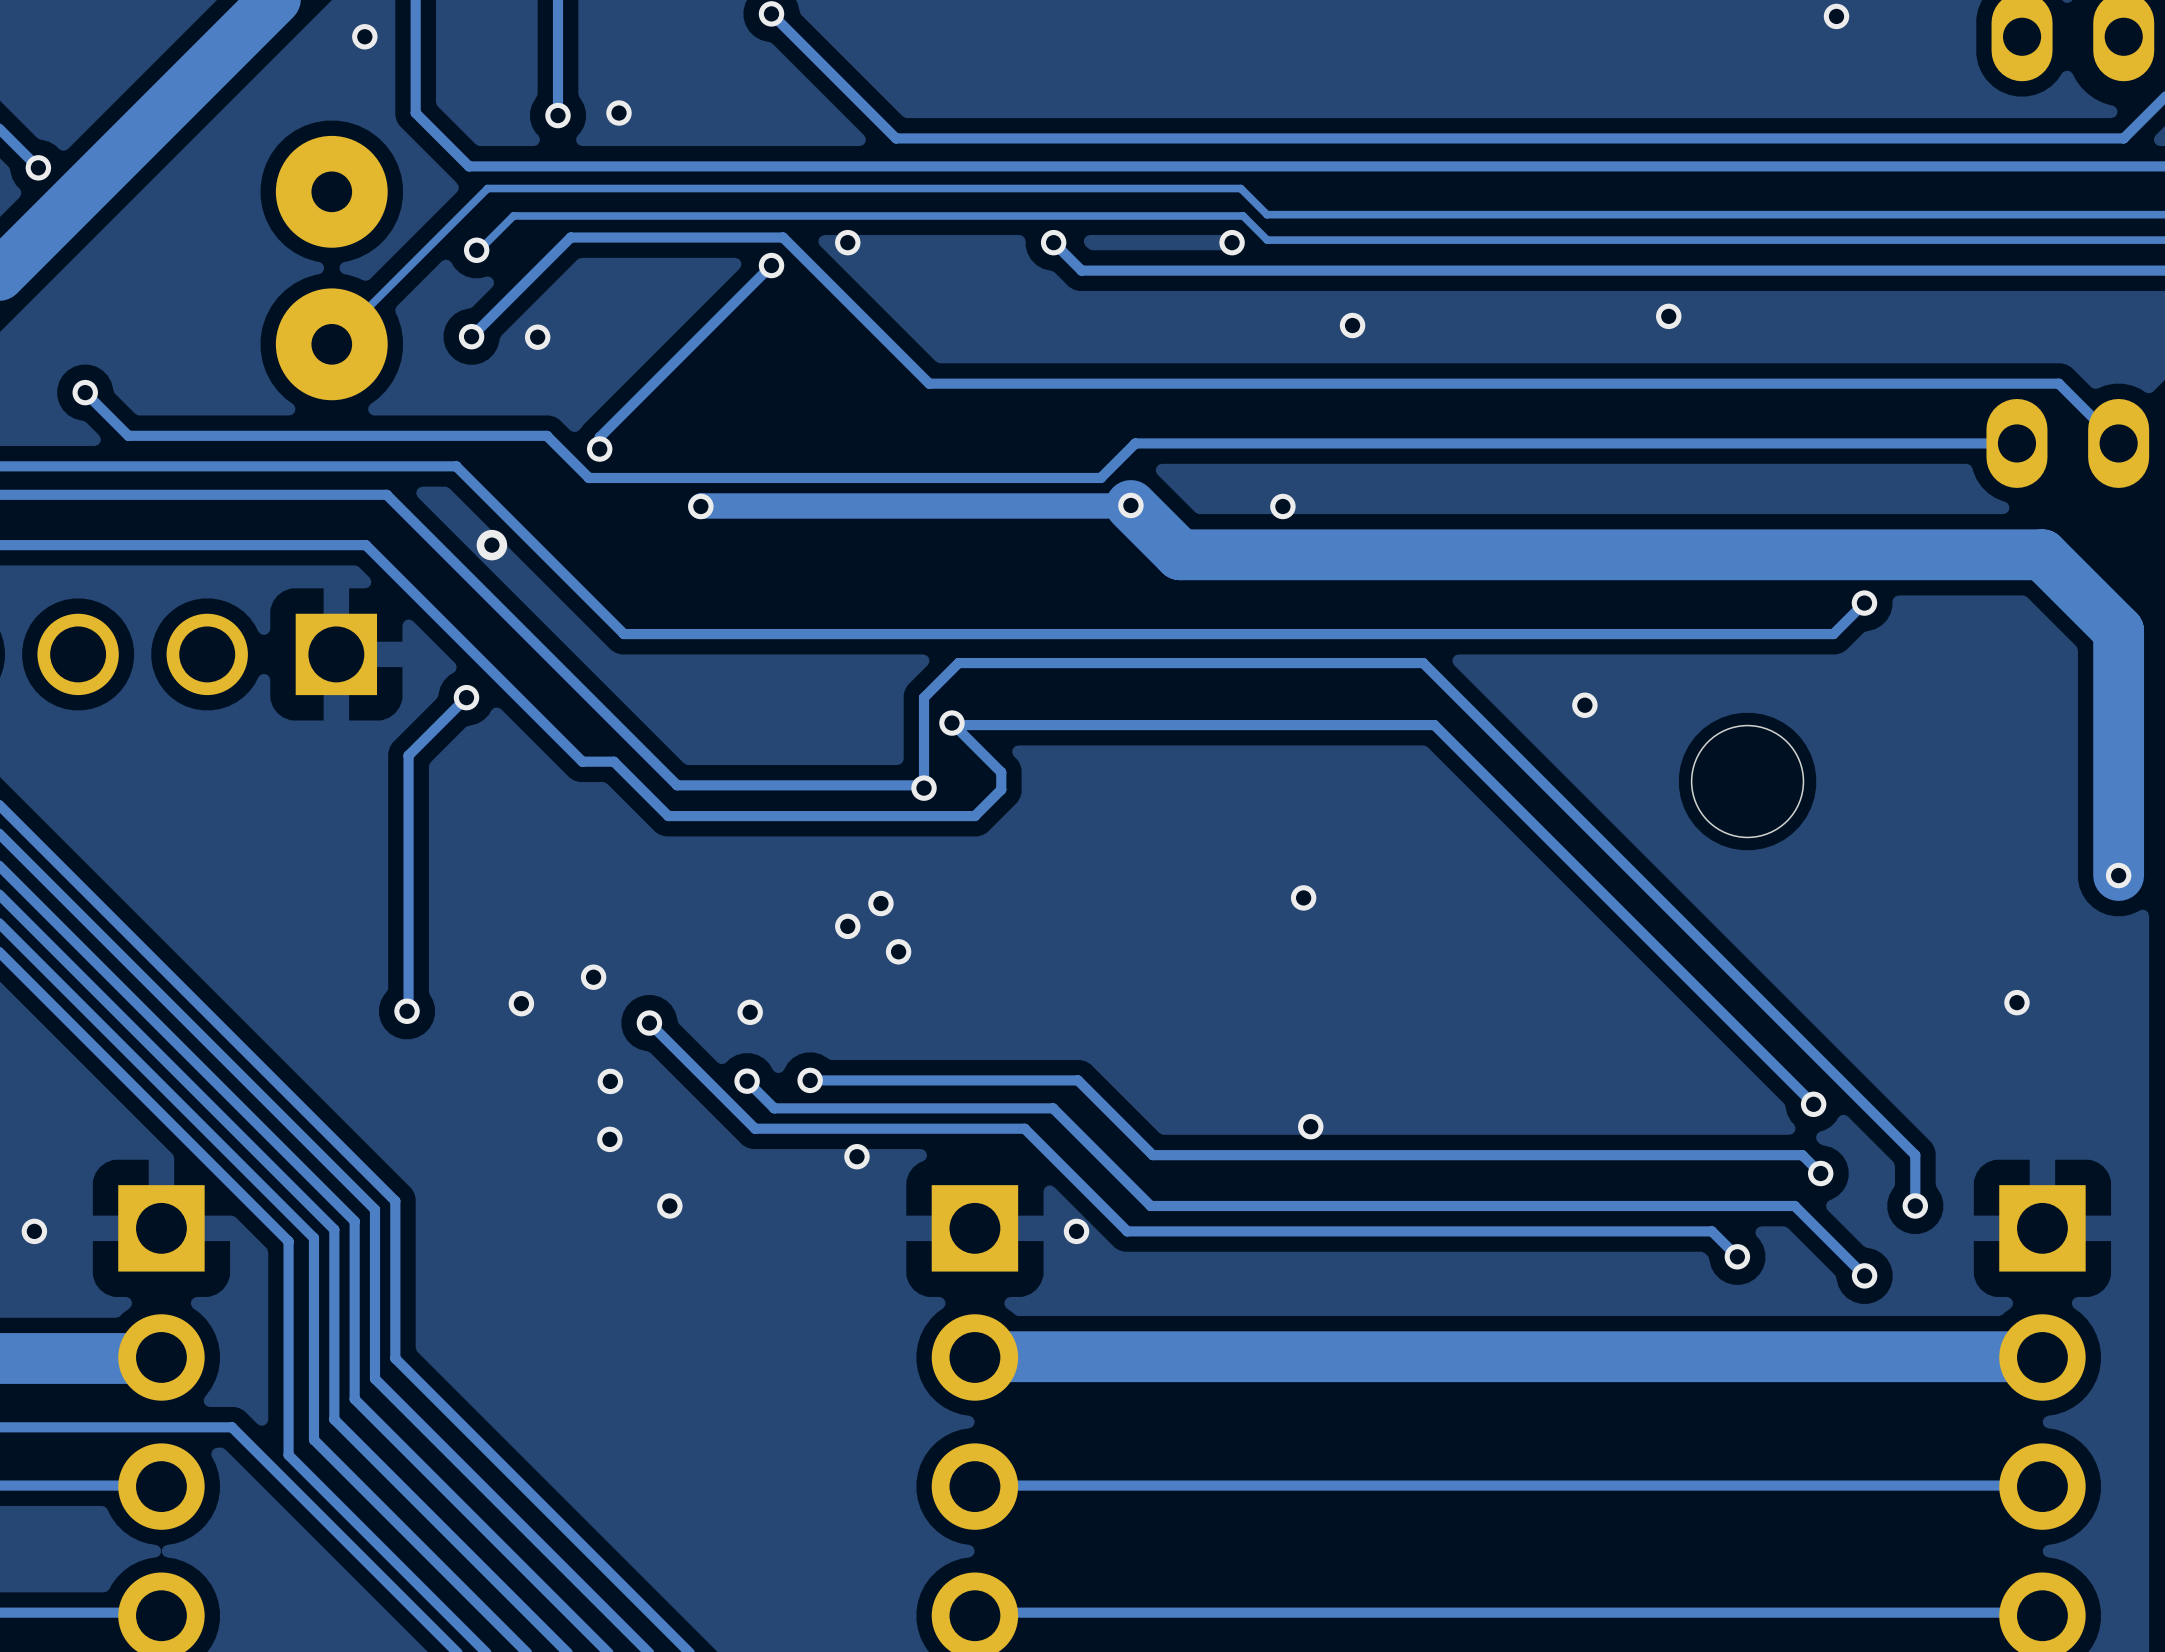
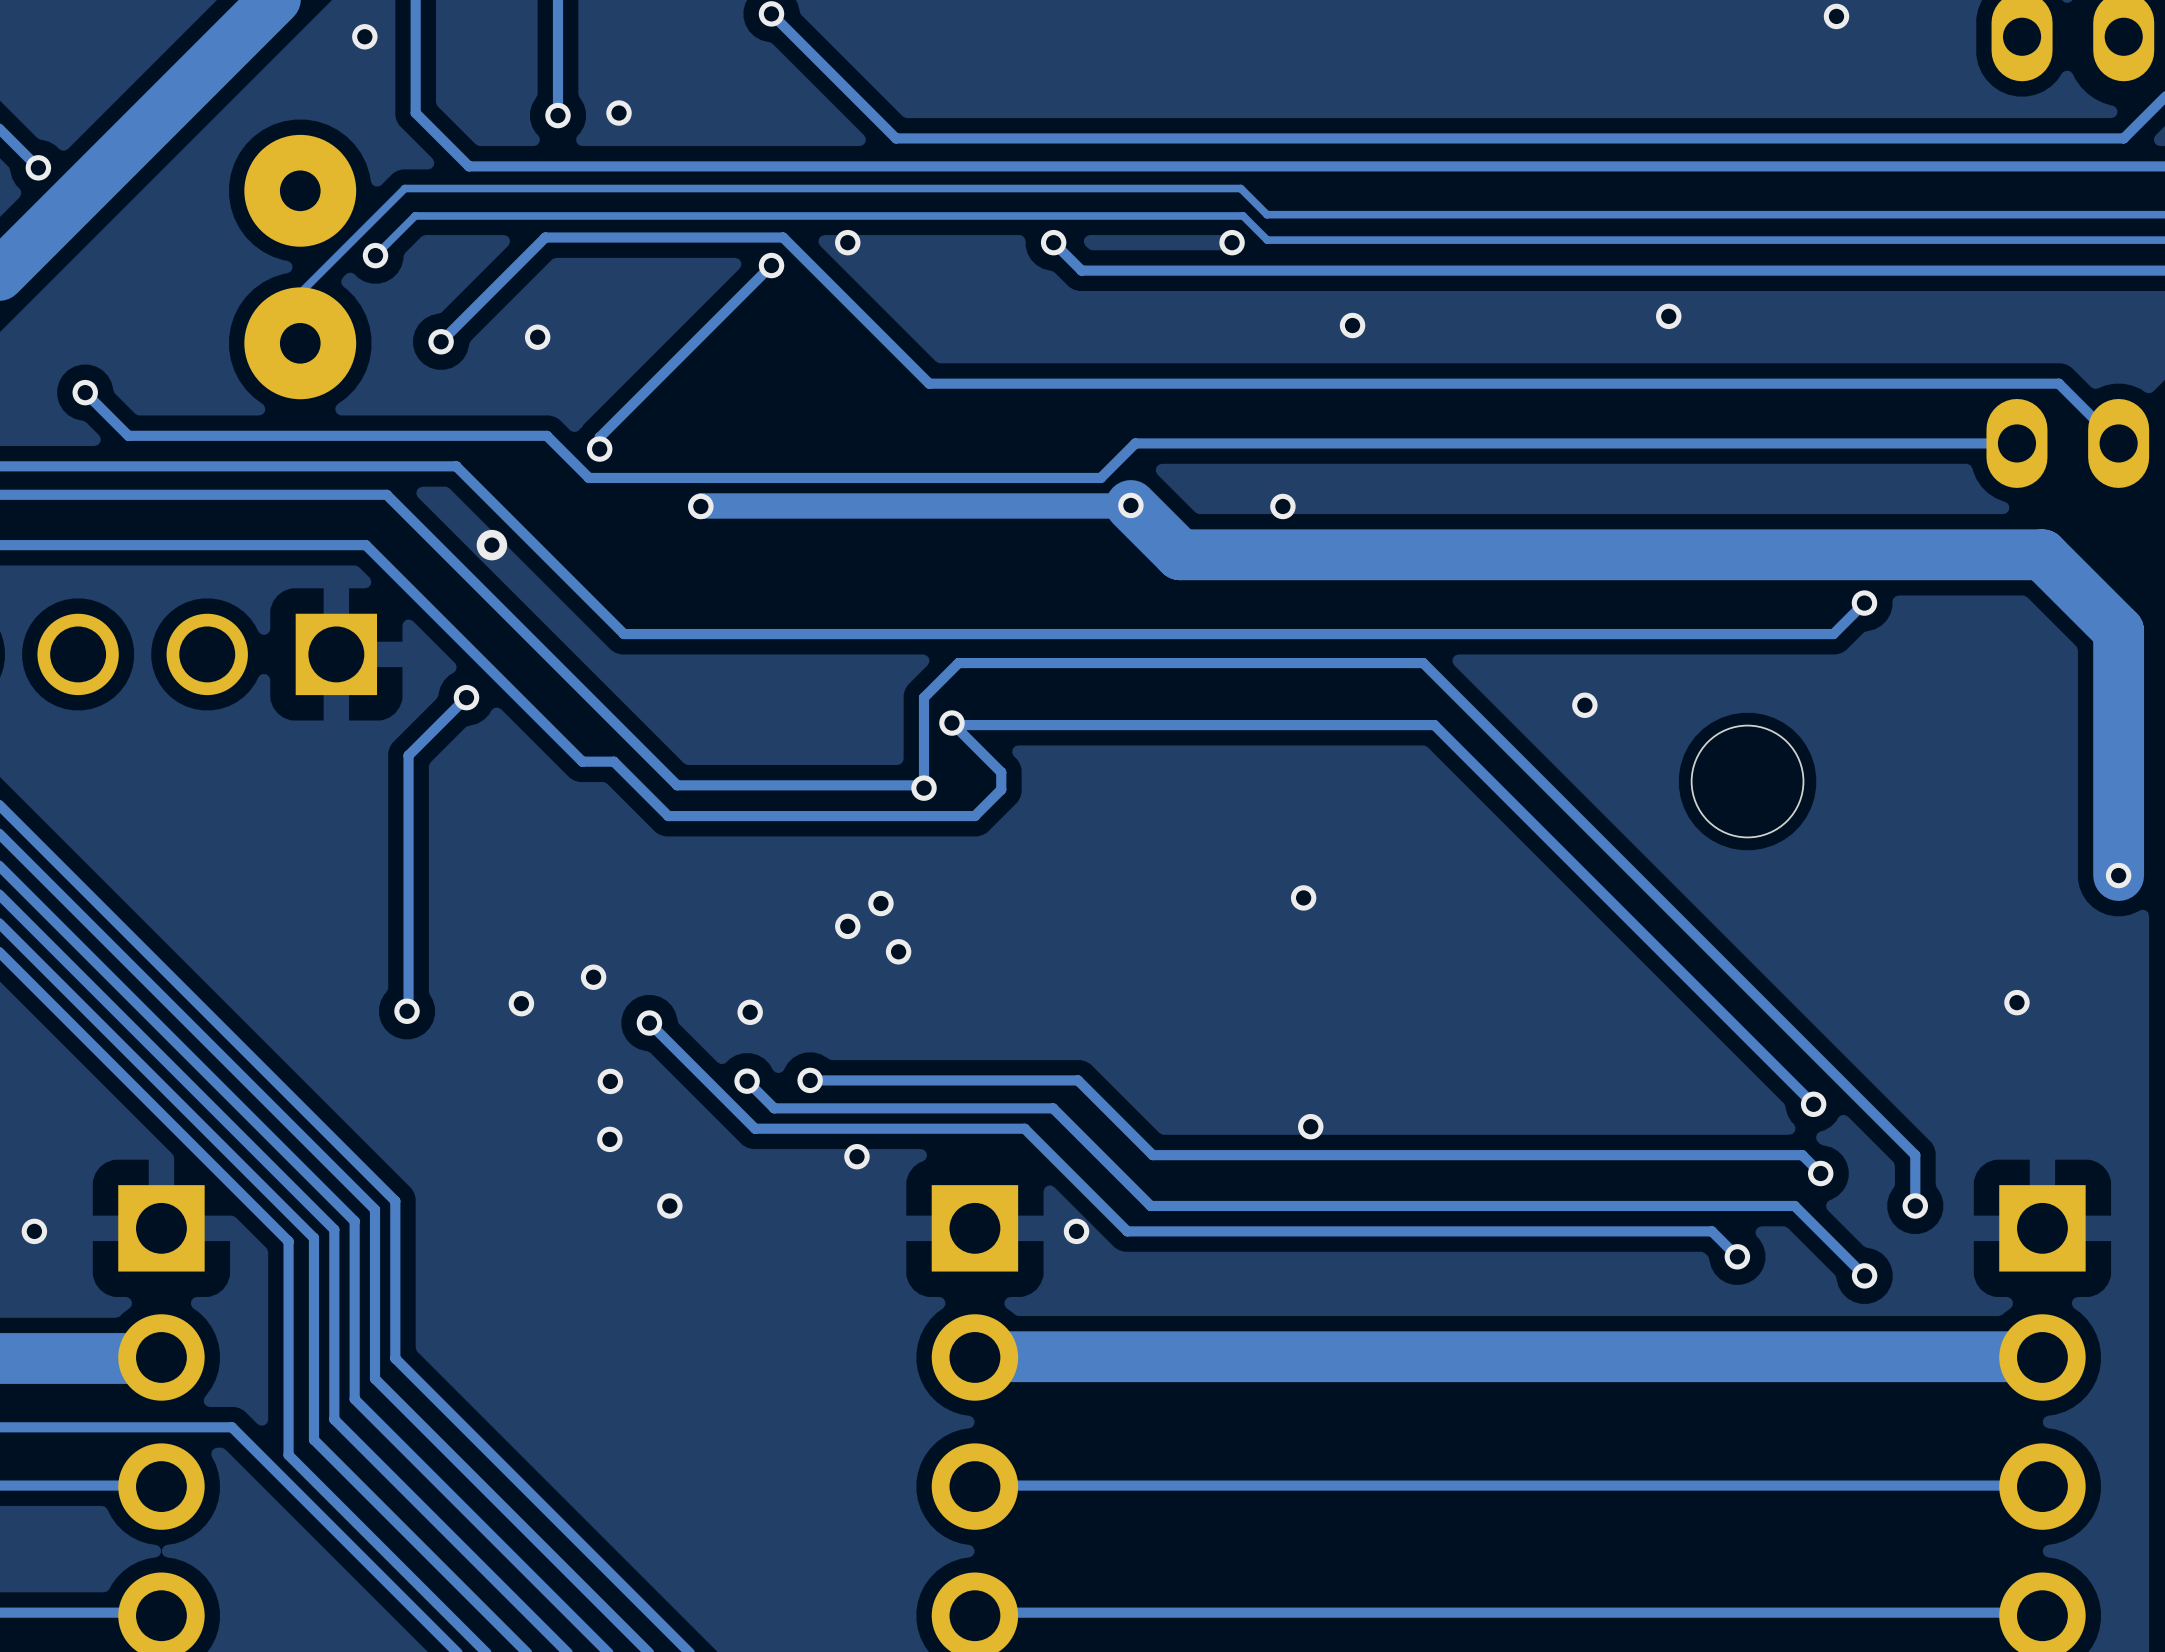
track: (487, 188) (332, 343) (315, 343) -> (487, 188) (404, 188) (300, 293) (300, 343)
part position: (331, 191) -> (300, 190)
track: (513, 215) (479, 250) (476, 250) -> (513, 215) (415, 215) (375, 255)
track: (570, 237) (471, 336) -> (570, 237) (545, 237) (441, 341)
via: (476, 250) -> none
via: none -> (375, 255)
via position: (471, 336) -> (441, 341)
part position: (331, 344) -> (300, 343)

